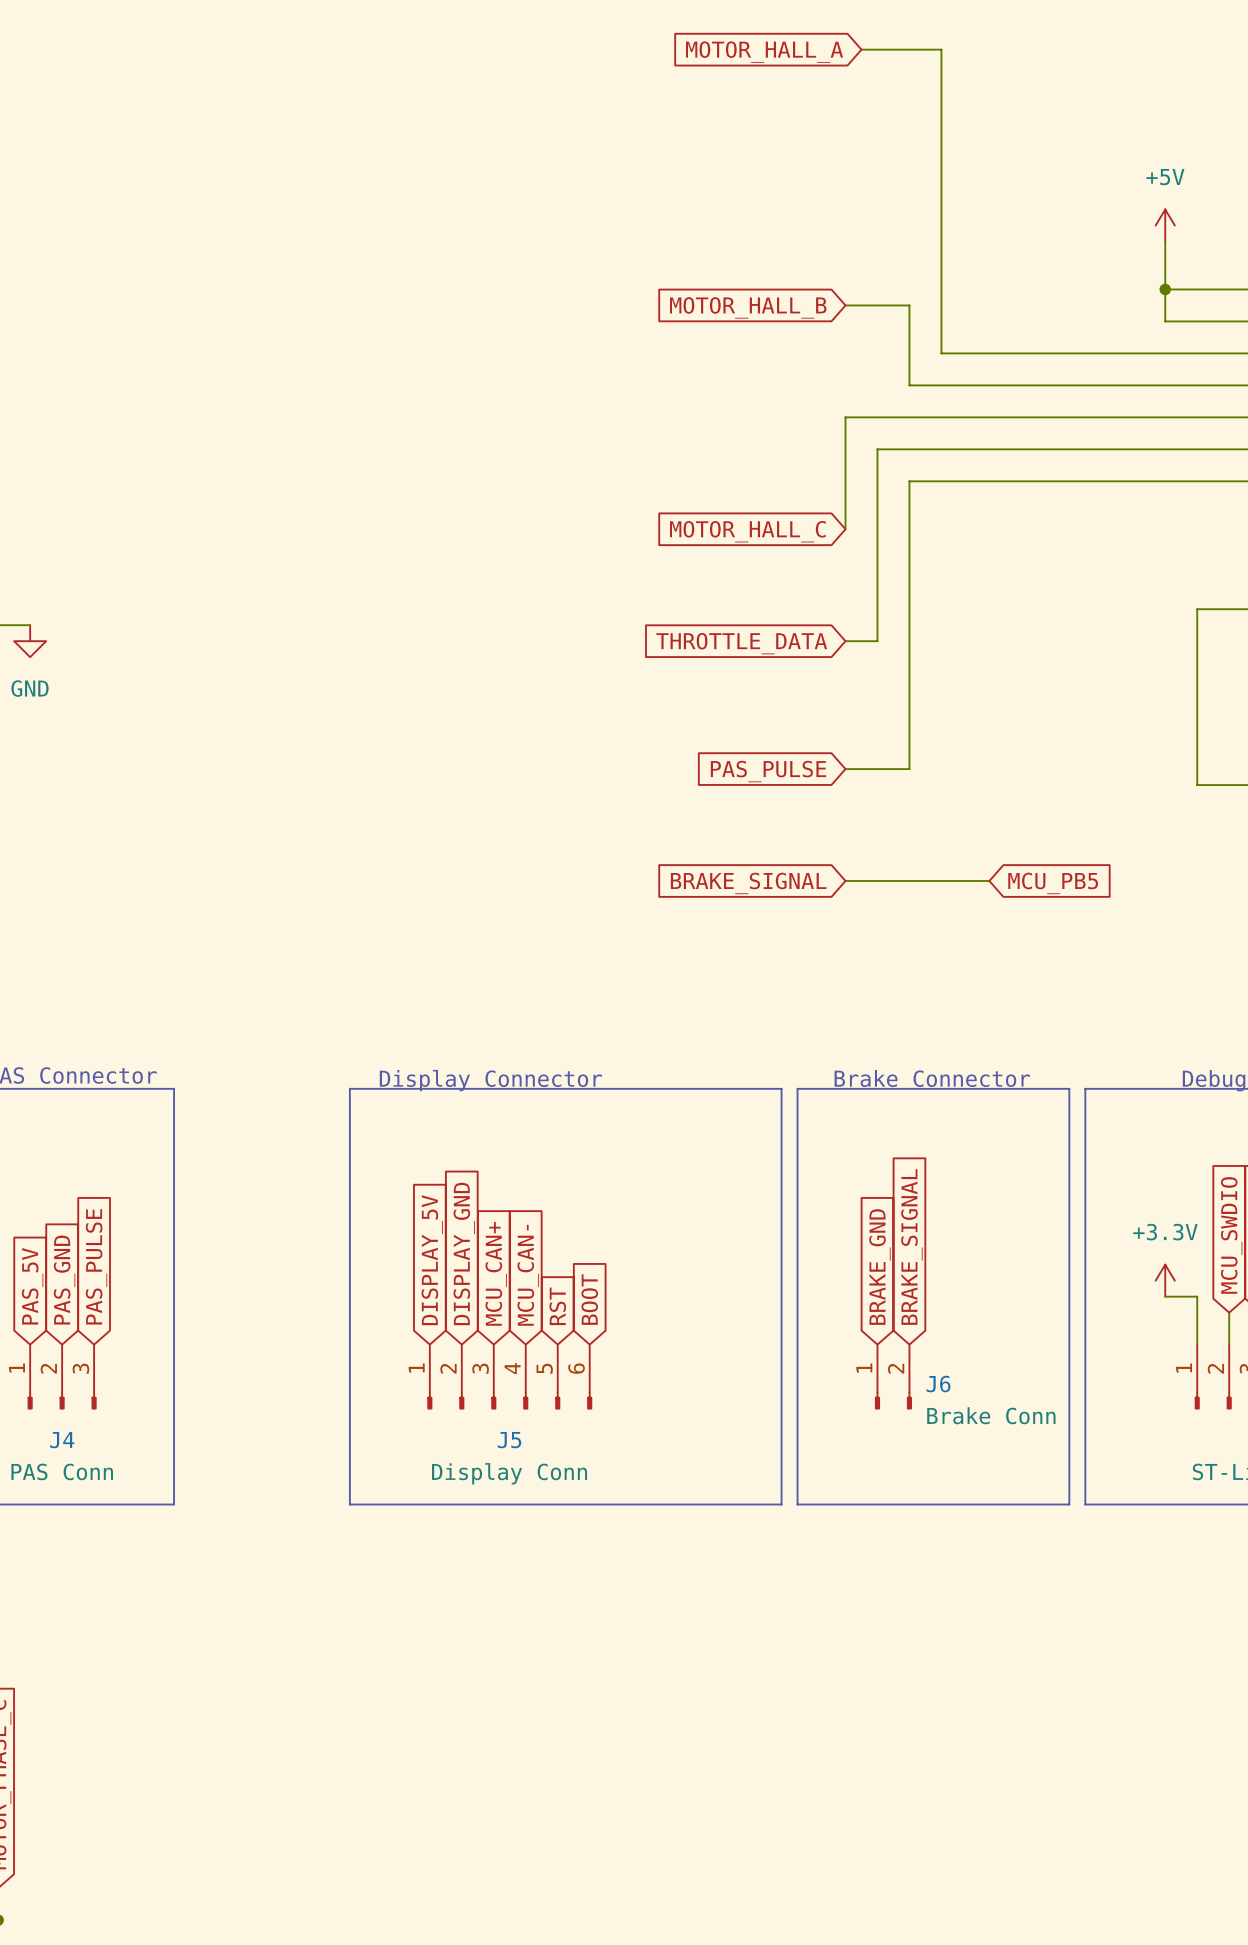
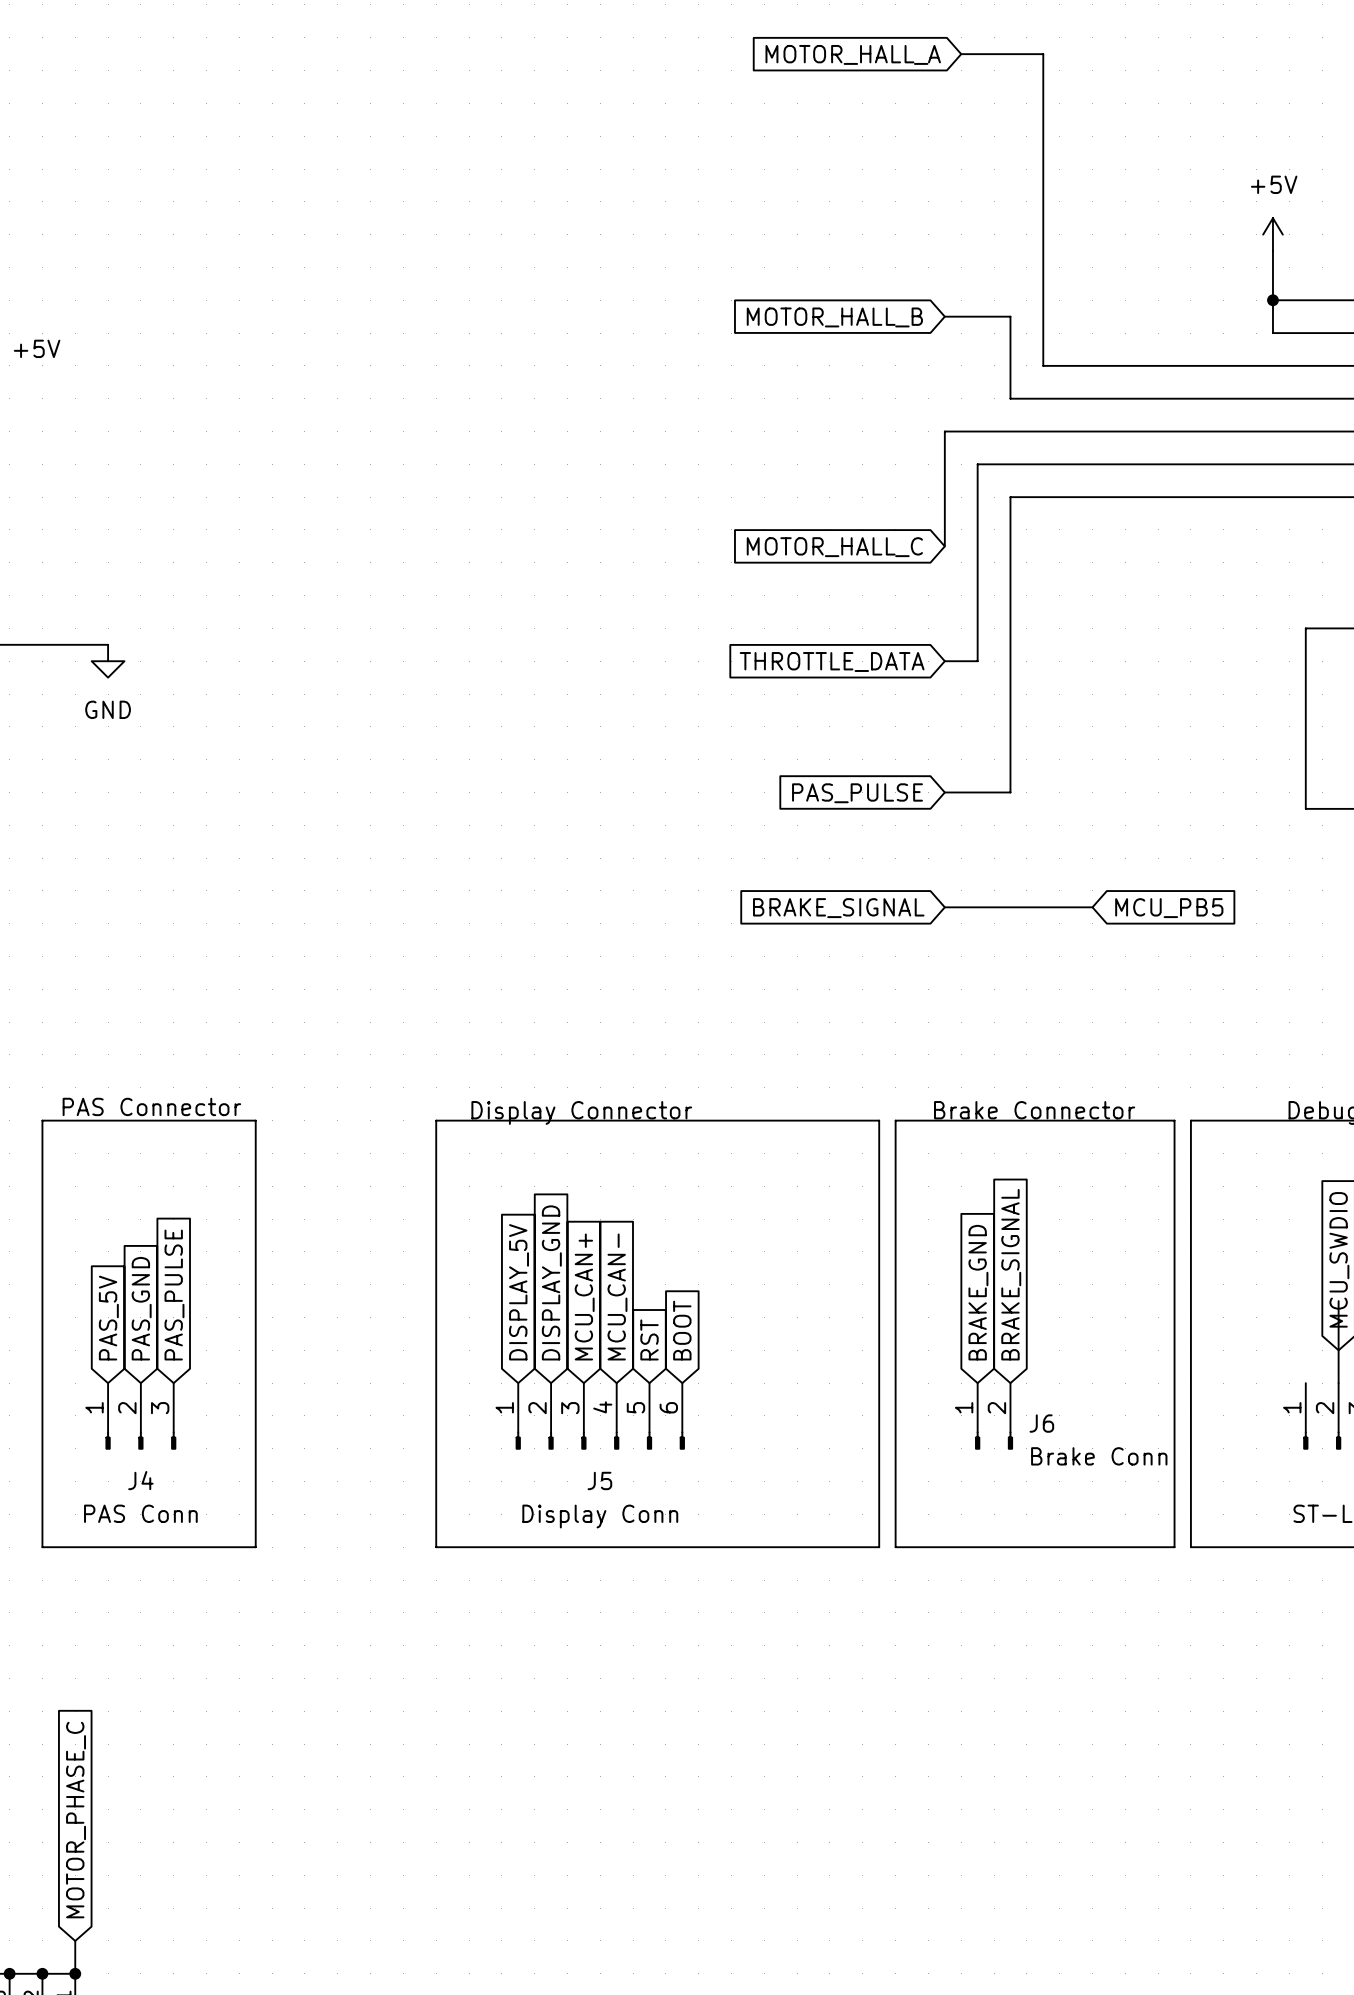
wire: none -> (1338, 1301) (1338, 1350)
power symbol: +3.3V (1165, 1280) -> none
wire: (1165, 1296) (1197, 1296) (1197, 1344) -> none

